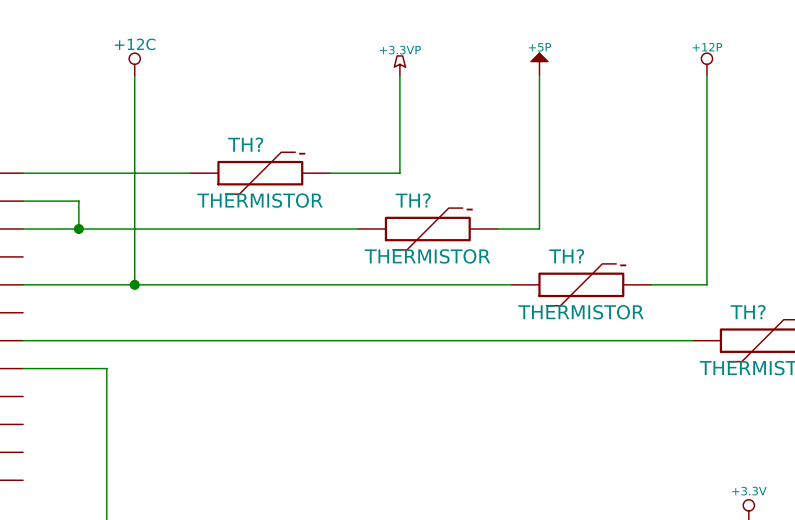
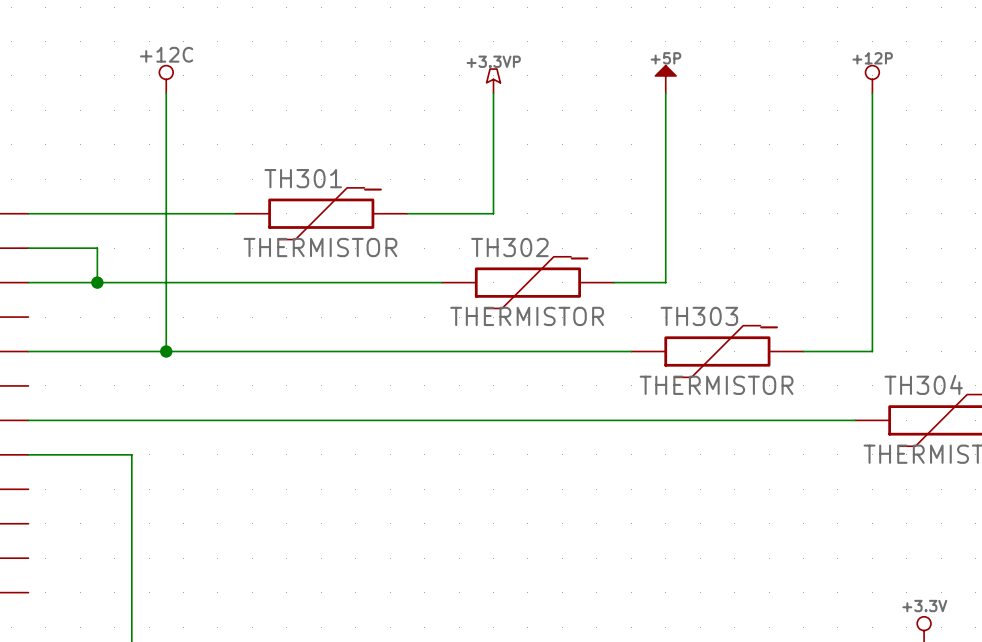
TH? name: TH? (245, 144) -> TH301 (303, 178)
TH? name: TH? (413, 200) -> TH302 (509, 247)
TH? name: TH? (566, 256) -> TH303 (699, 316)
TH? name: TH? (748, 312) -> TH304 (923, 384)

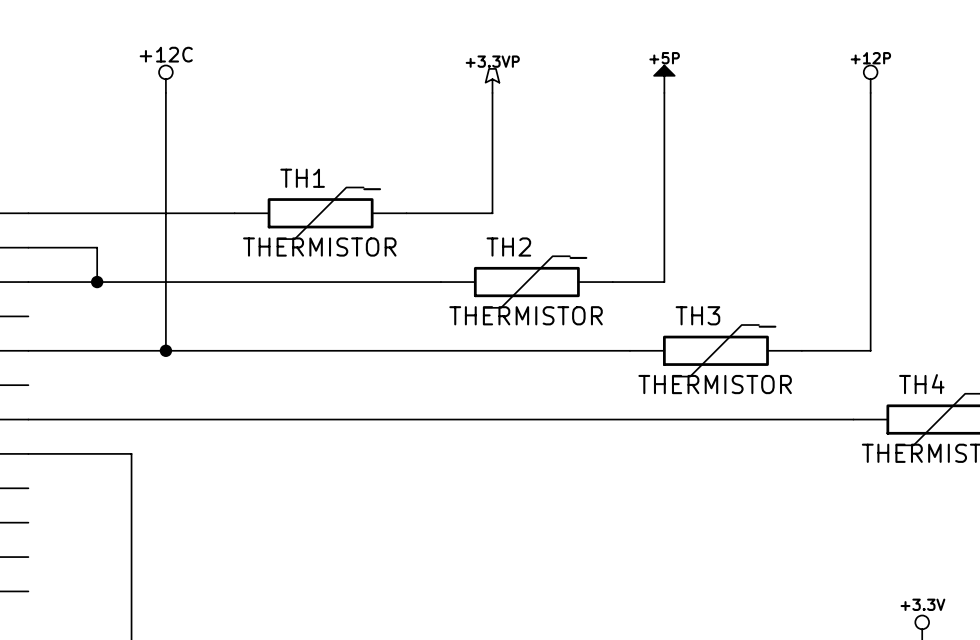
TH301 name: TH301 (303, 178) -> TH1 (302, 178)
TH302 name: TH302 (509, 247) -> TH2 (508, 247)
TH303 name: TH303 (699, 316) -> TH3 (697, 315)
TH304 name: TH304 (923, 384) -> TH4 (921, 384)

